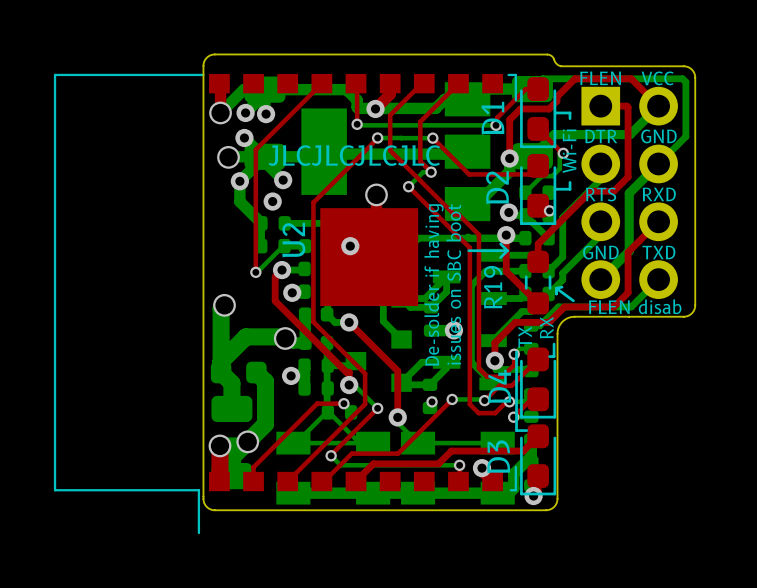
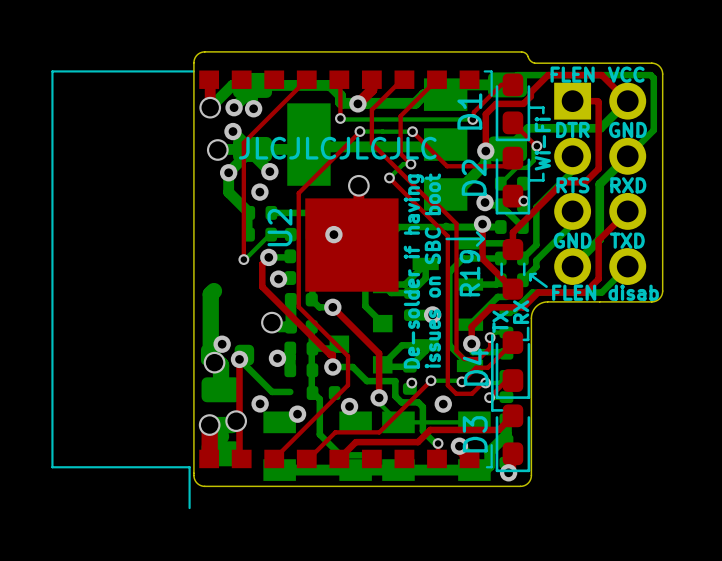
via position: (224, 305) -> (214, 362)
bottom track: (285, 338) (286, 336) (245, 336) (221, 361) -> none
via: none -> (222, 344)
bottom track: (256, 372) (265, 381) (265, 424) (231, 457) (231, 476) -> none
bottom track: none -> (239, 359) (272, 391) (290, 391)
via: none -> (239, 359)
bottom track: (354, 385) (377, 408) -> (337, 367) (352, 367) (366, 381) (395, 381) (395, 396) (401, 402) (418, 402) (422, 407) (422, 431) (438, 446)
top track: (343, 403) (317, 403) (253, 467) (253, 481) -> (239, 359) (239, 456) (241, 458)
via: (343, 403) -> none
top track: (377, 408) (331, 455) -> none
via: (377, 408) -> none
bottom track: none -> (312, 391) (319, 399) (319, 434) (340, 455) (376, 455)
via: none -> (260, 403)
via: none -> (443, 404)
via: none -> (349, 406)
via: none -> (297, 414)
bottom track: (293, 443) (373, 443) -> none
bottom track: (296, 443) (327, 411) (359, 443) -> none
bottom track: (331, 455) (340, 465) (459, 465) -> none
via: (331, 455) -> none

